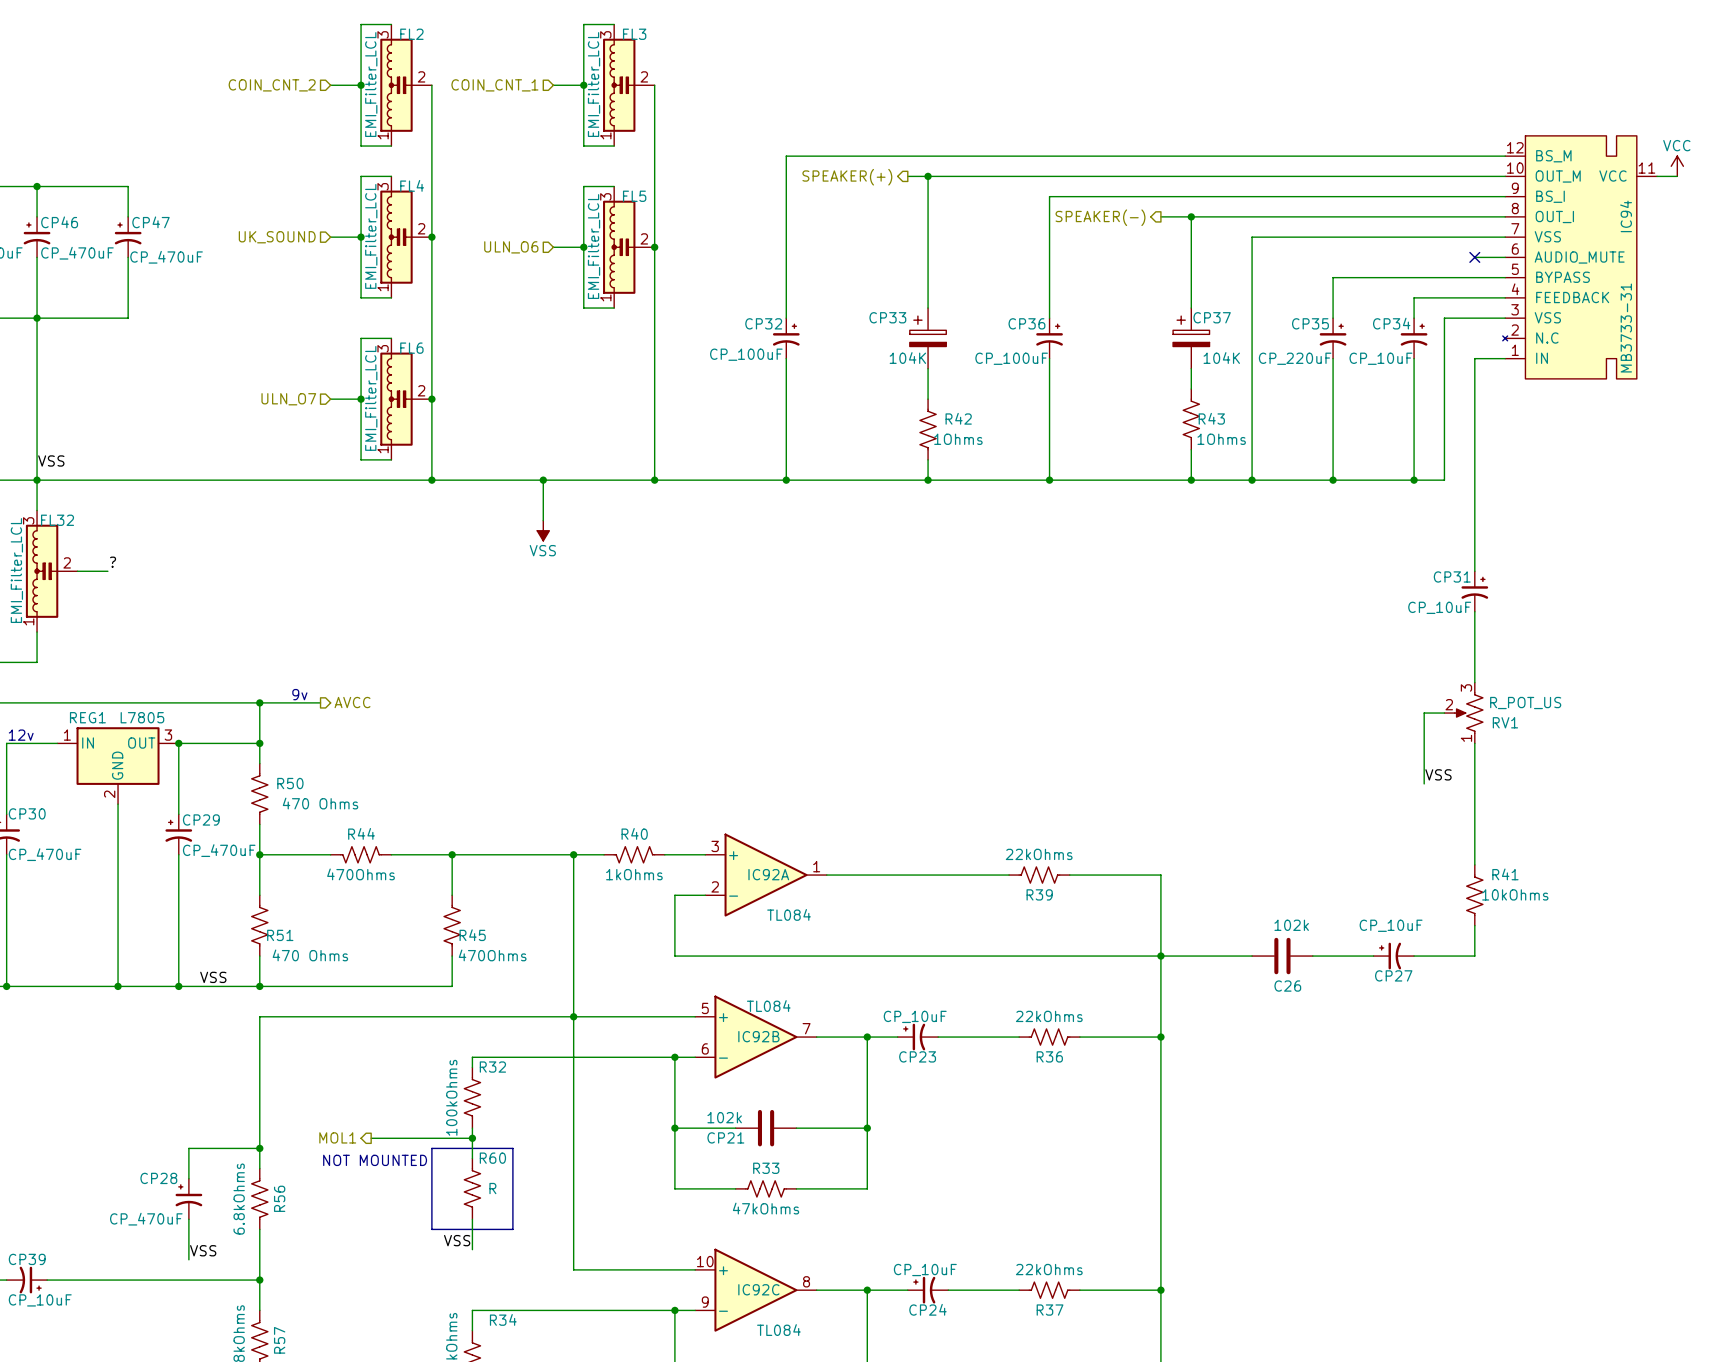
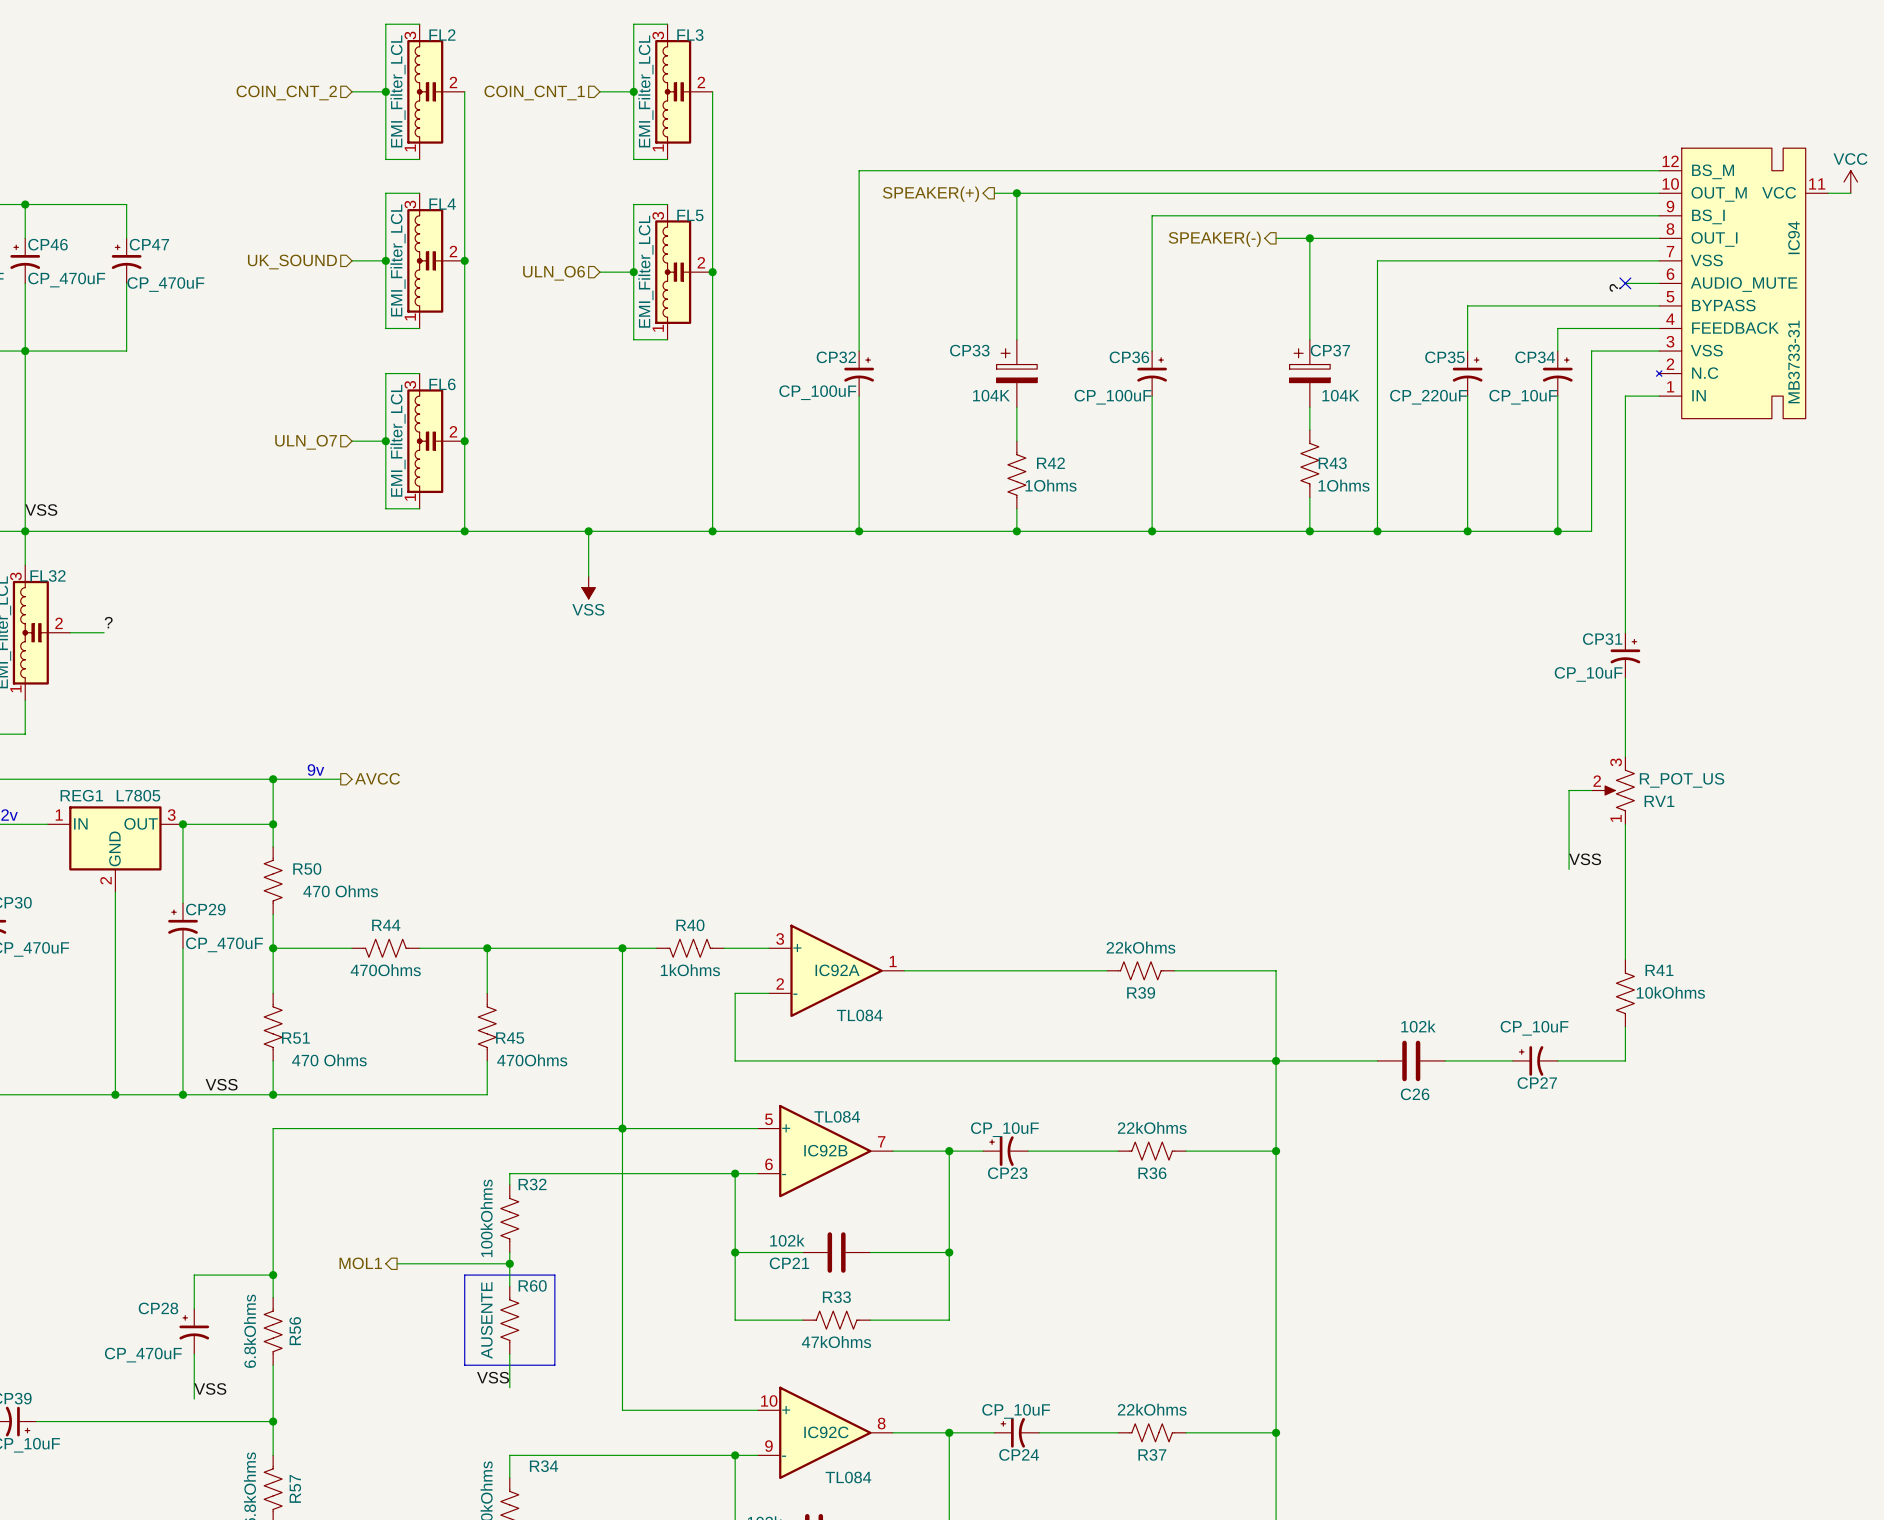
label: none -> ? (1615, 287)
text: NOT MOUNTED (375, 1160) -> none
R60 value: R (492, 1188) -> AUSENTE (486, 1320)

